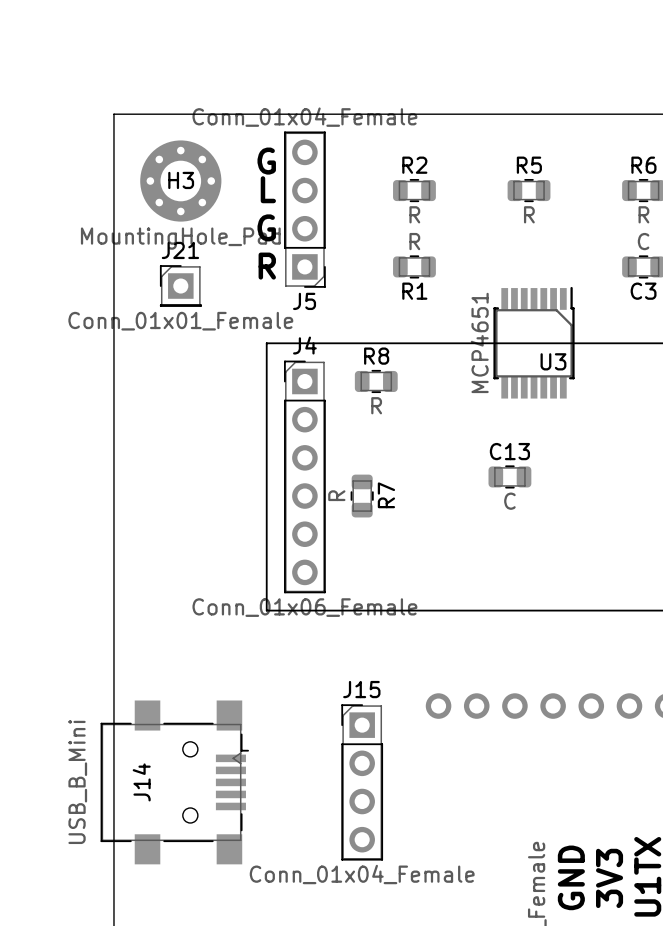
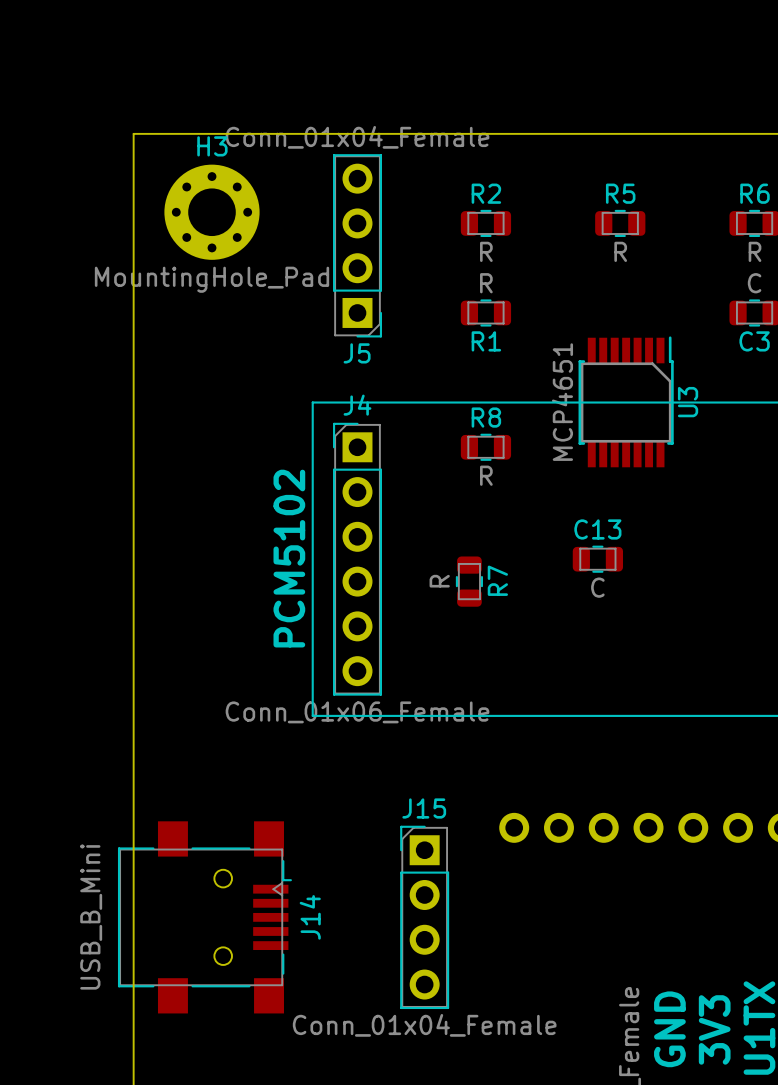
text: G (266, 161) -> none
H3 name position: H3 (181, 180) -> H3 (212, 146)
text: L (268, 189) -> none
text: G (266, 227) -> none
text: R (267, 266) -> none
J21: Conn_01x01_Female (180, 286) -> none
U3 name rotation: 0° (553, 361) -> 90° counterclockwise (688, 402)
U3 name position: U3 (553, 361) -> U3 (688, 402)
R8 position: (376, 381) -> (485, 447)
text: none -> PCM5102 (289, 558)
R7 position: (362, 496) -> (469, 581)
J14 name position: J14 (141, 782) -> J14 (310, 917)

